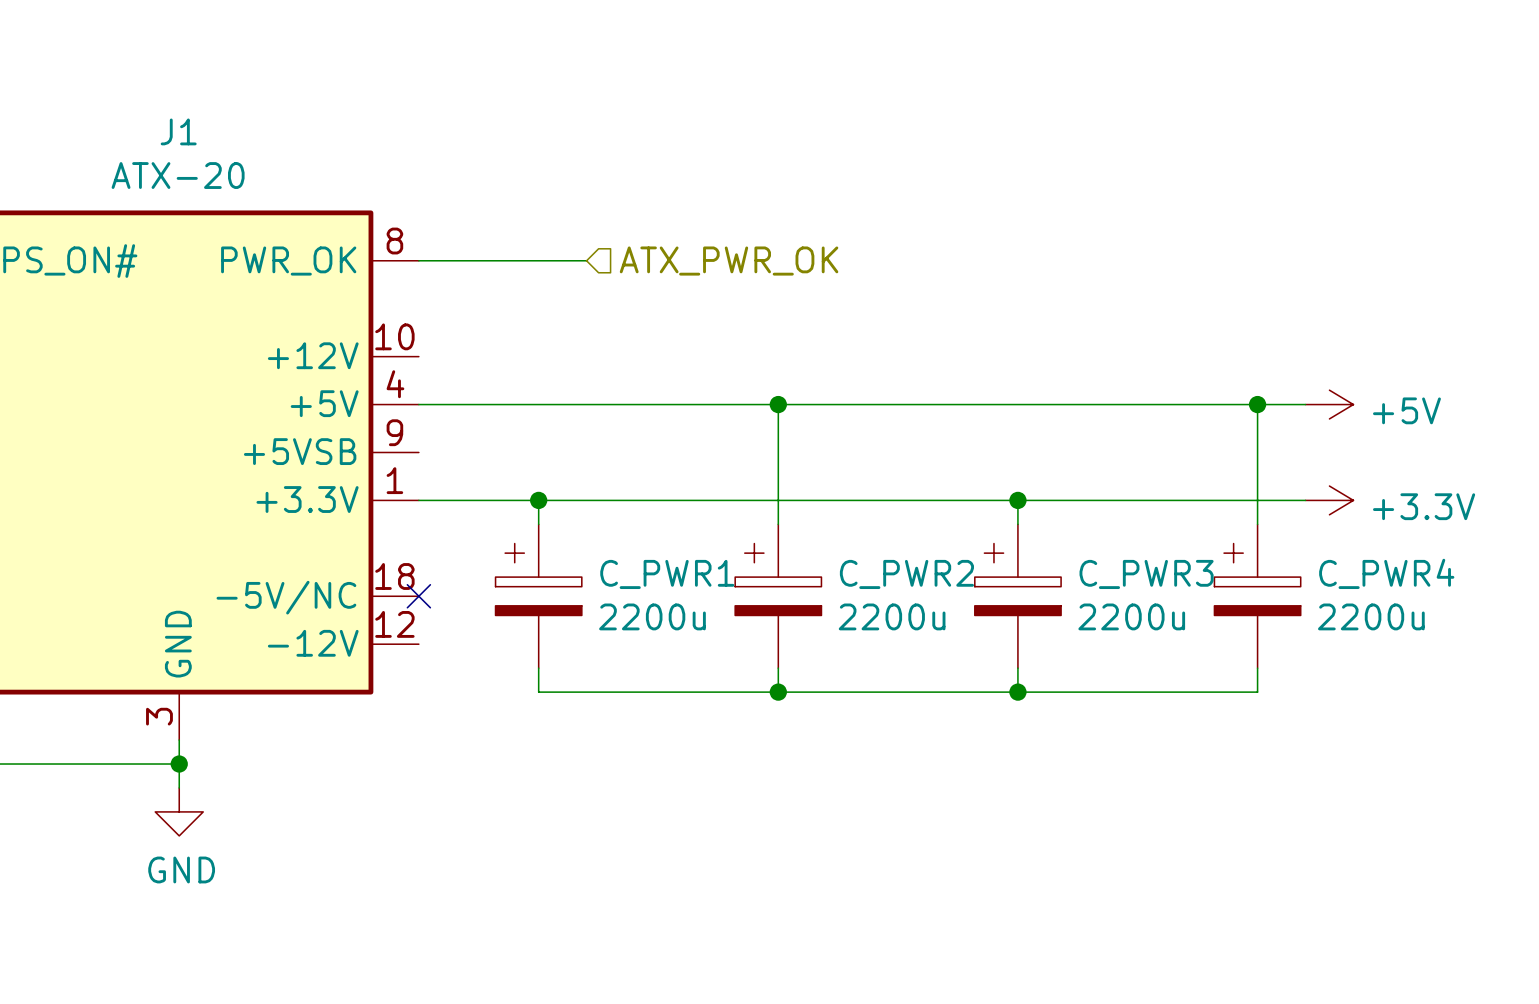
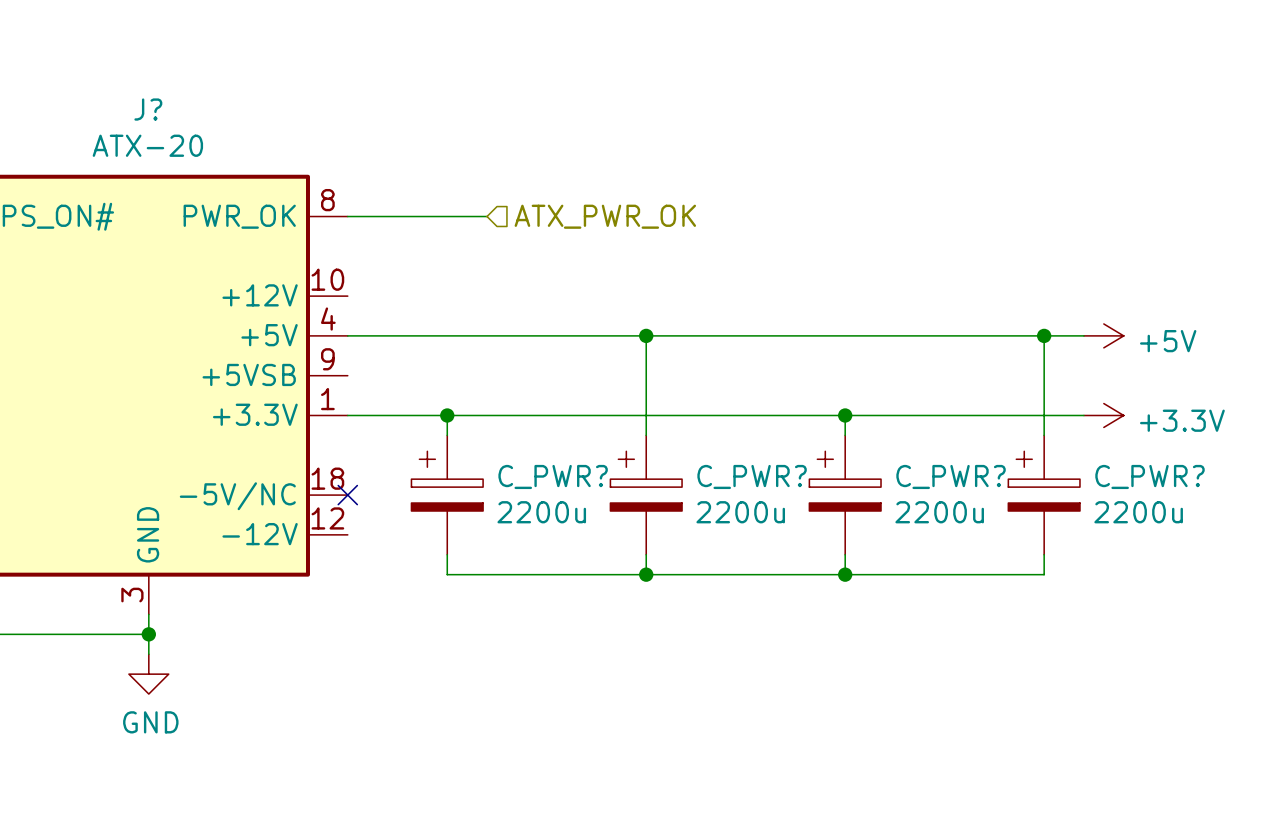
J1 name: J1 (178, 131) -> J? (148, 109)
C_PWR4 name: C_PWR4 (1386, 573) -> C_PWR? (1150, 476)
C_PWR1 name: C_PWR1 (667, 574) -> C_PWR? (553, 476)
C_PWR2 name: C_PWR2 (906, 574) -> C_PWR? (752, 476)
C_PWR3 name: C_PWR3 (1146, 574) -> C_PWR? (951, 476)

